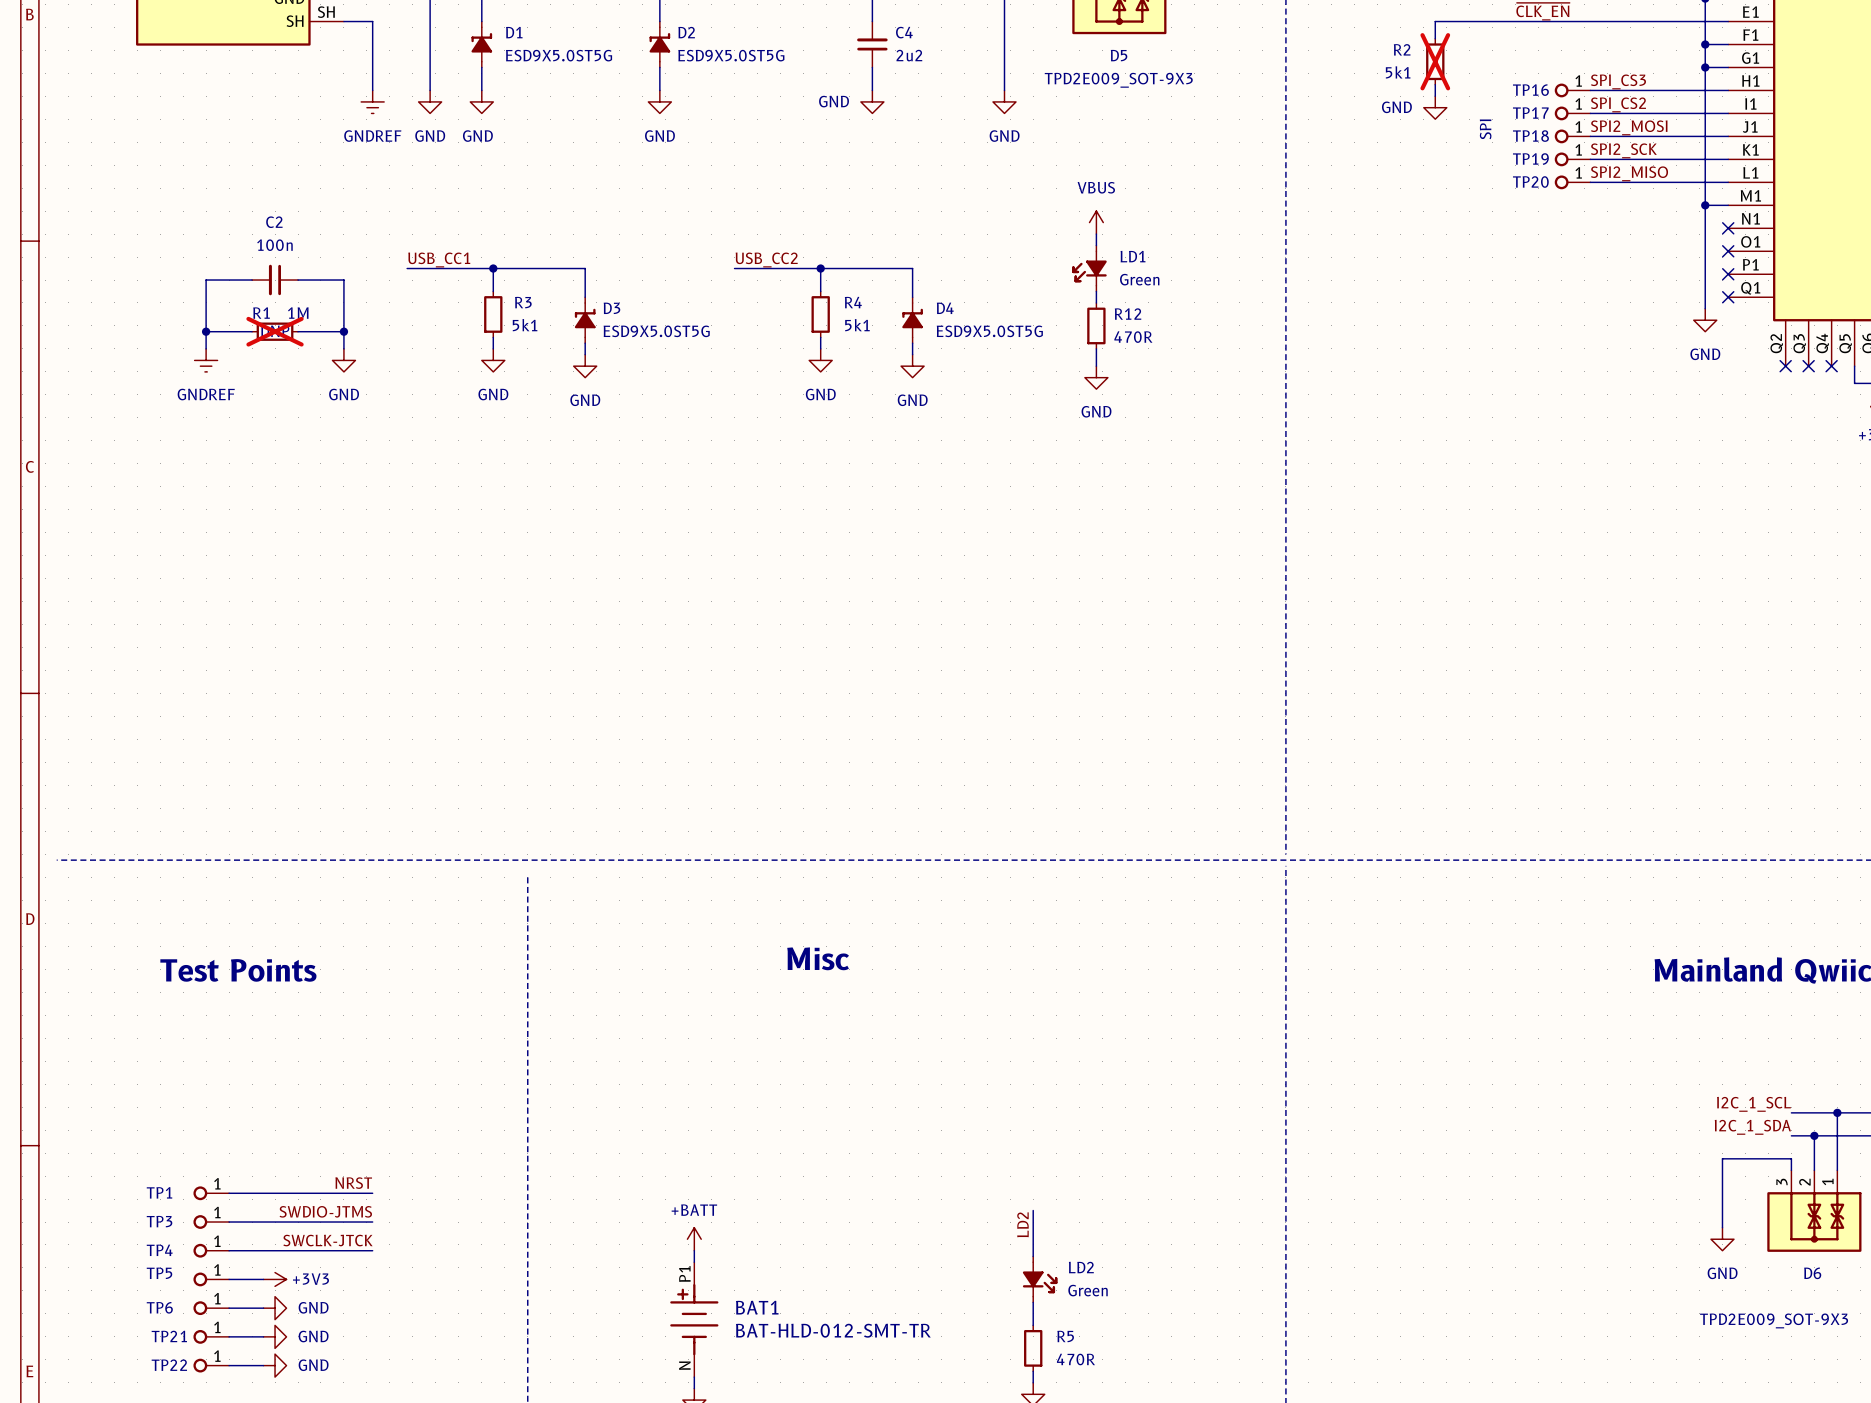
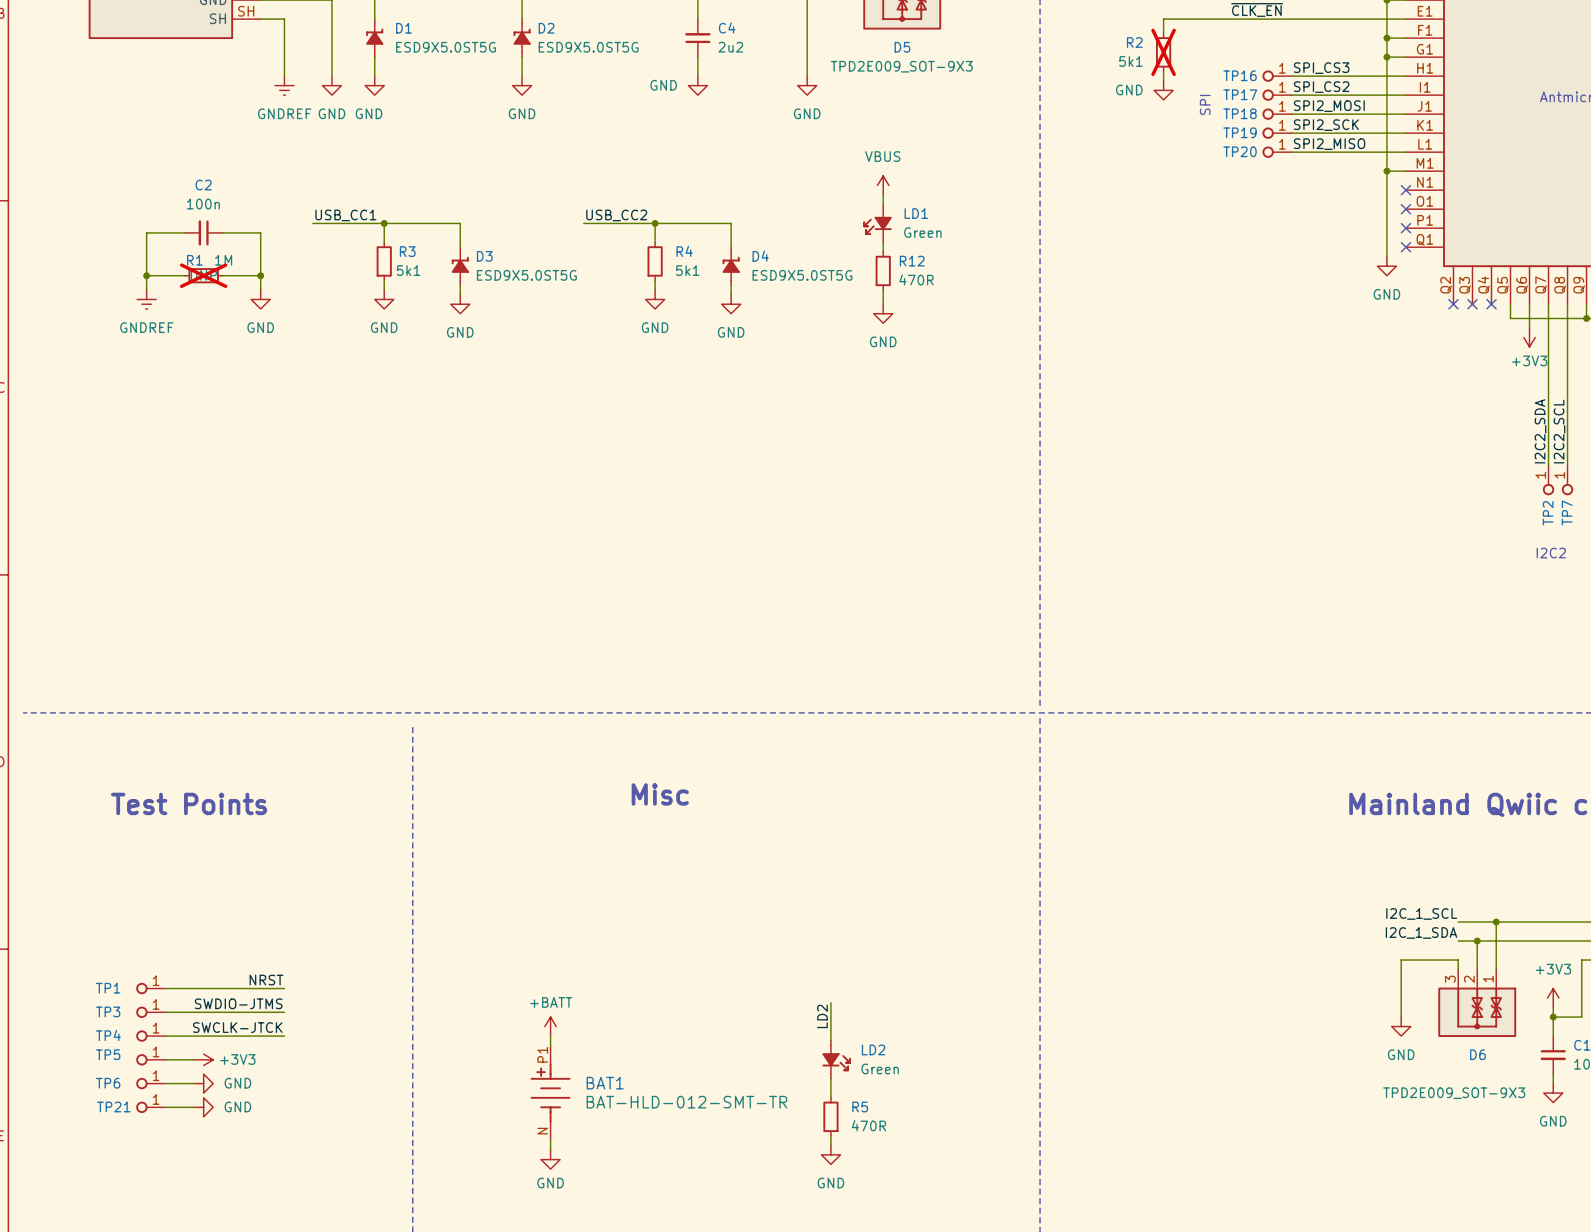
TP22: (211, 1365) -> none
wire: (229, 1365) (263, 1365) -> none
power symbol: GND (275, 1365) -> none

